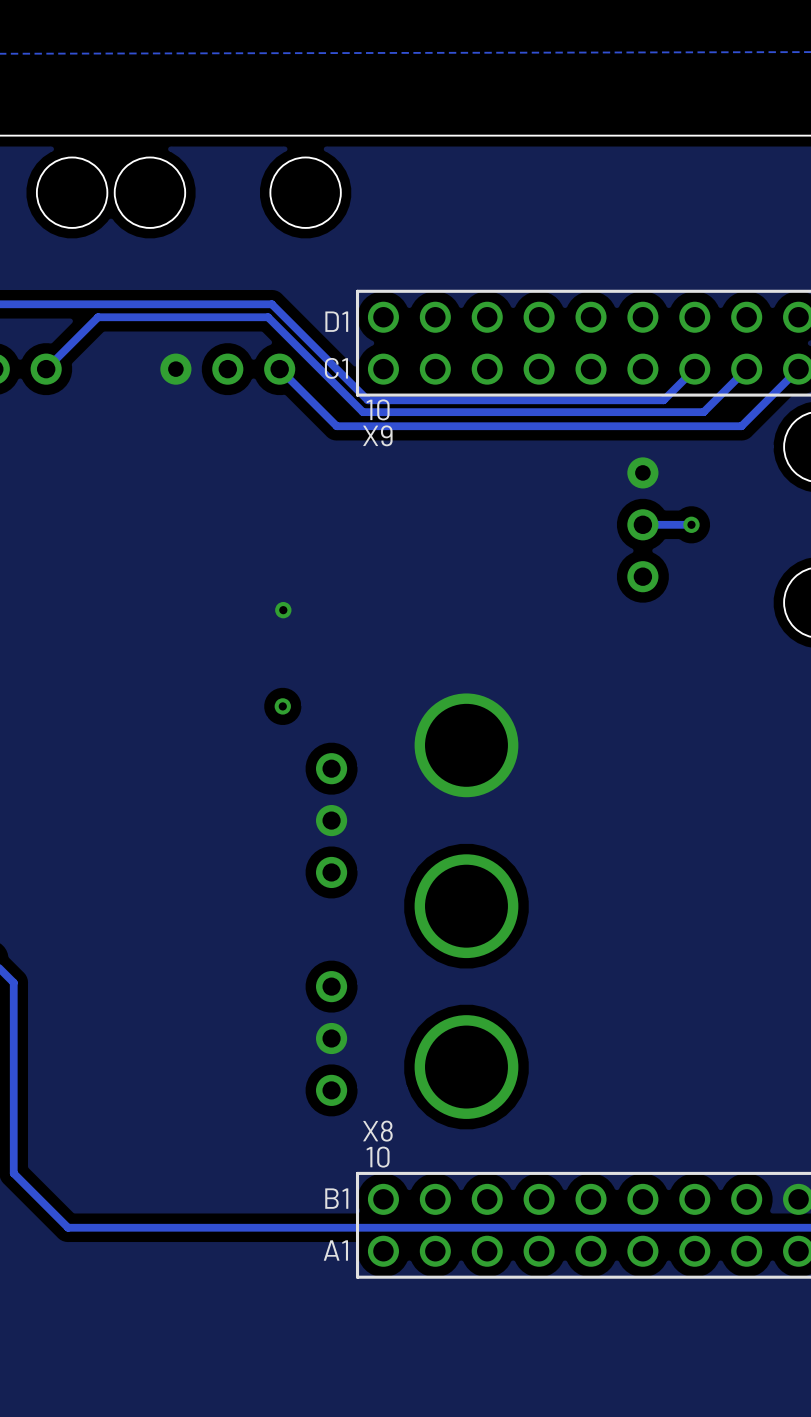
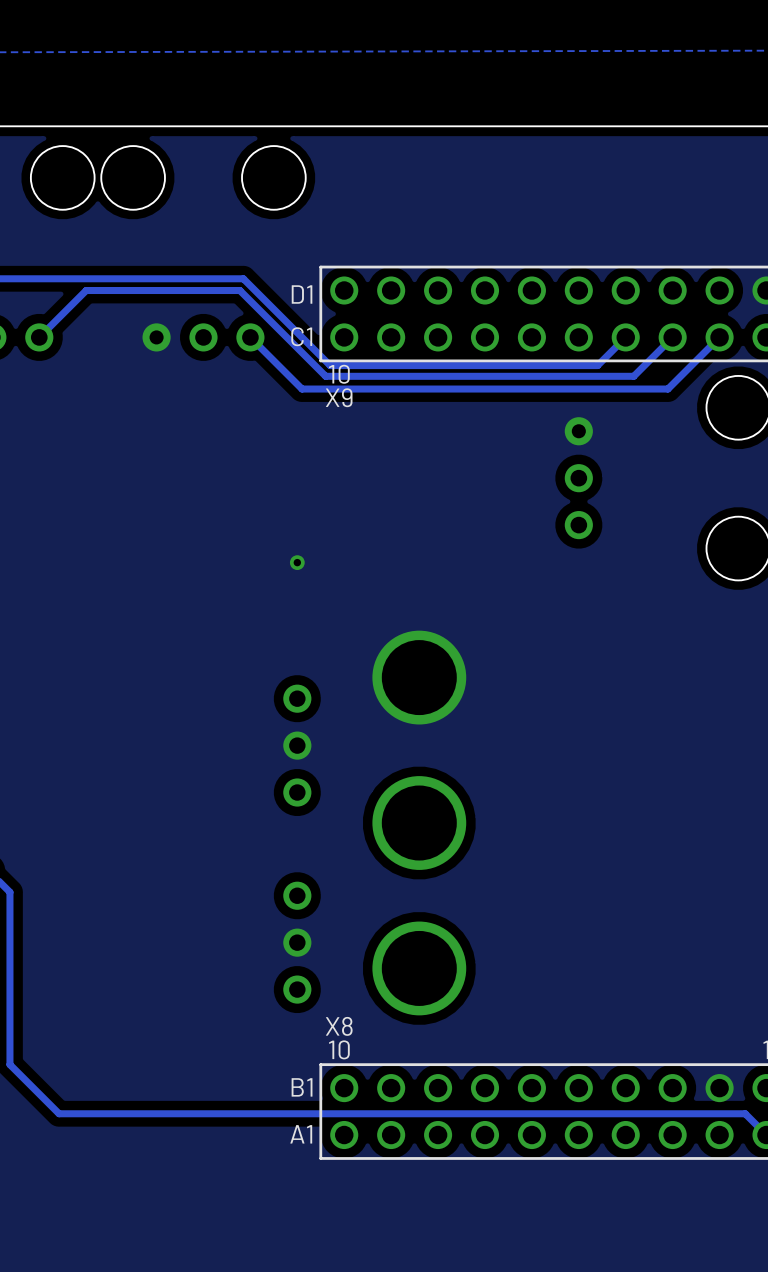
track: (691, 524) (642, 524) -> none
via: (691, 524) -> none
via position: (283, 610) -> (297, 562)
via: (282, 706) -> none

